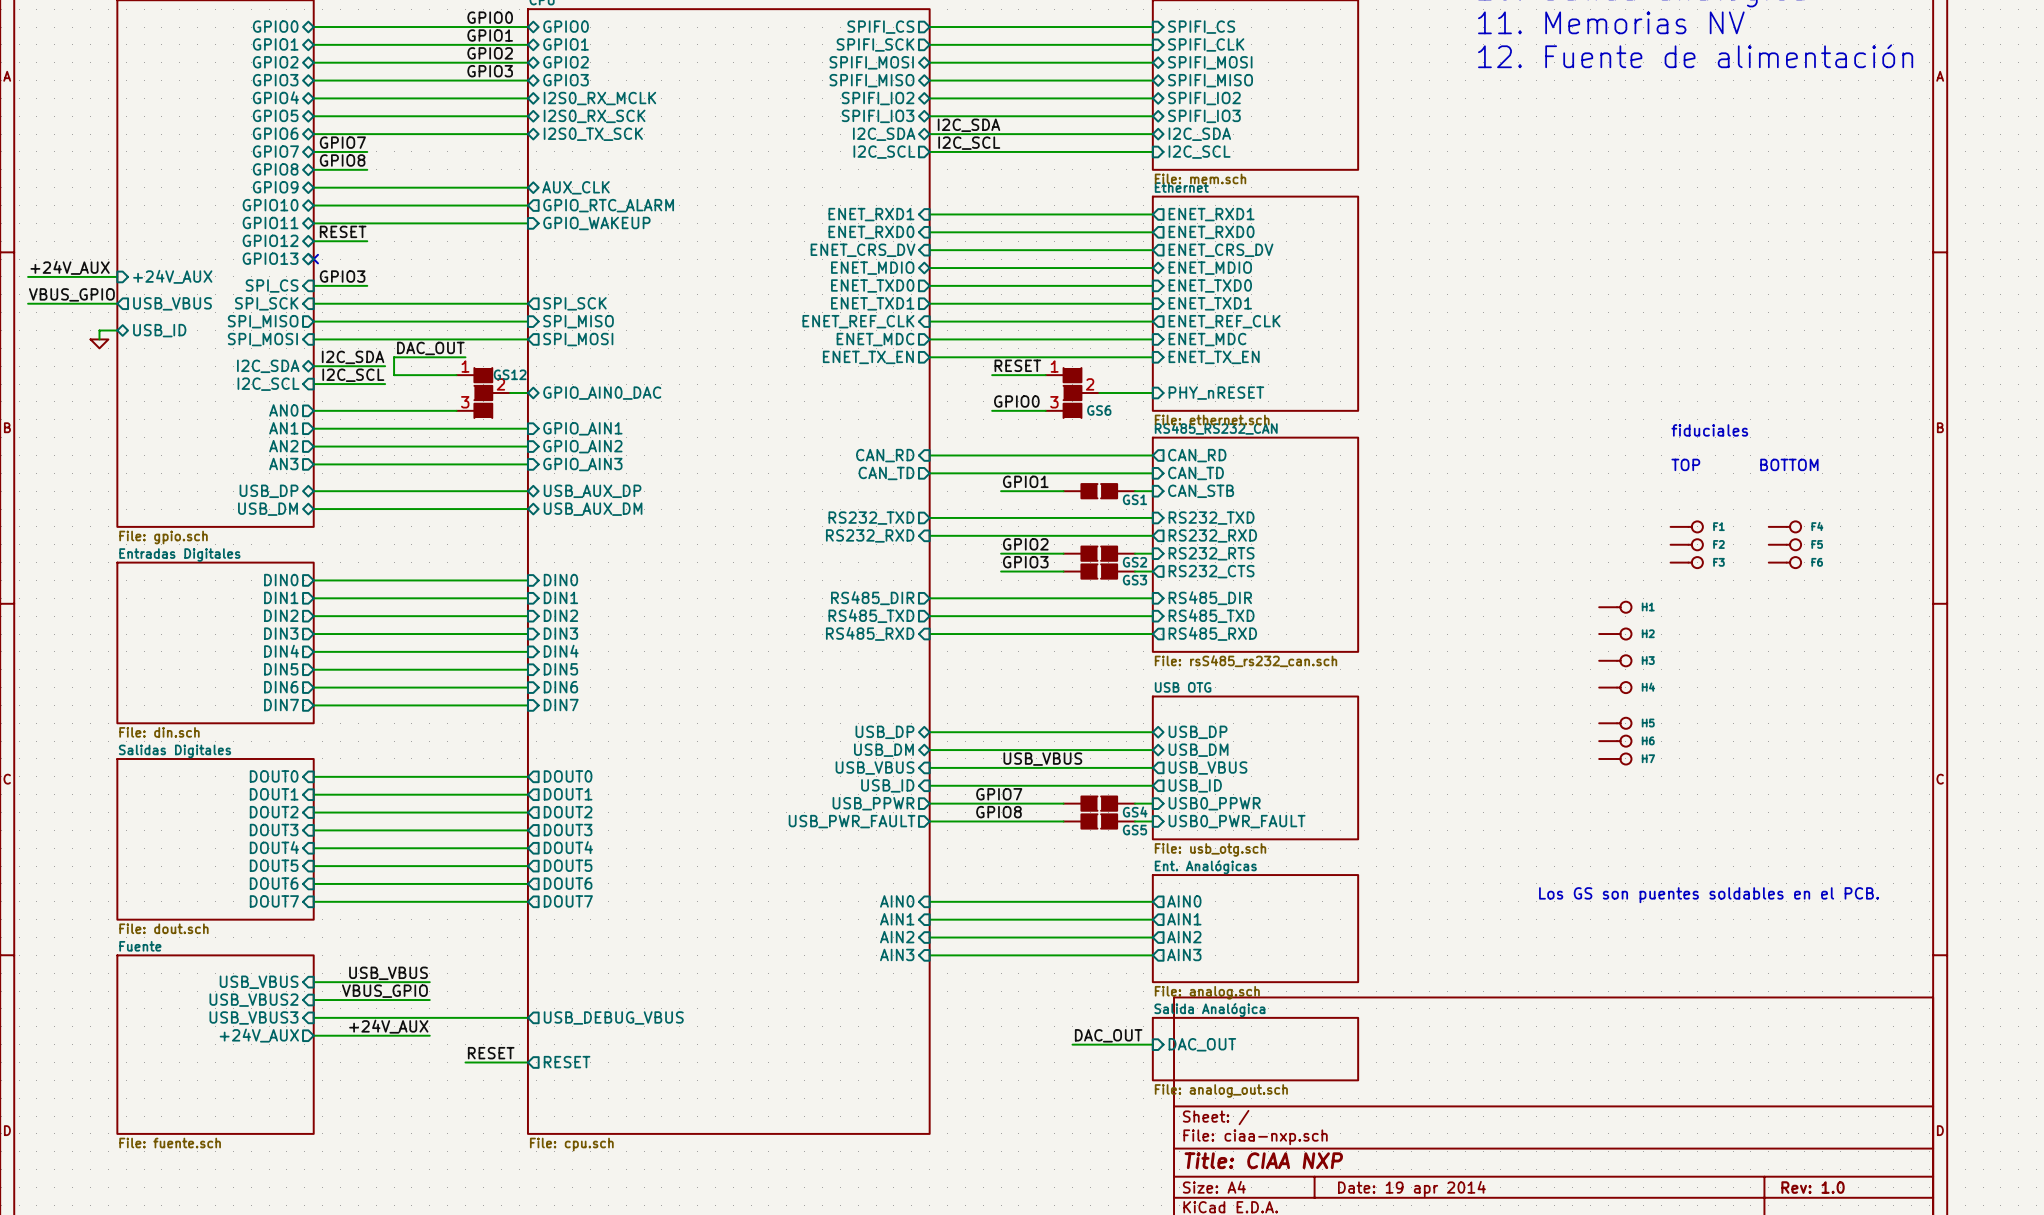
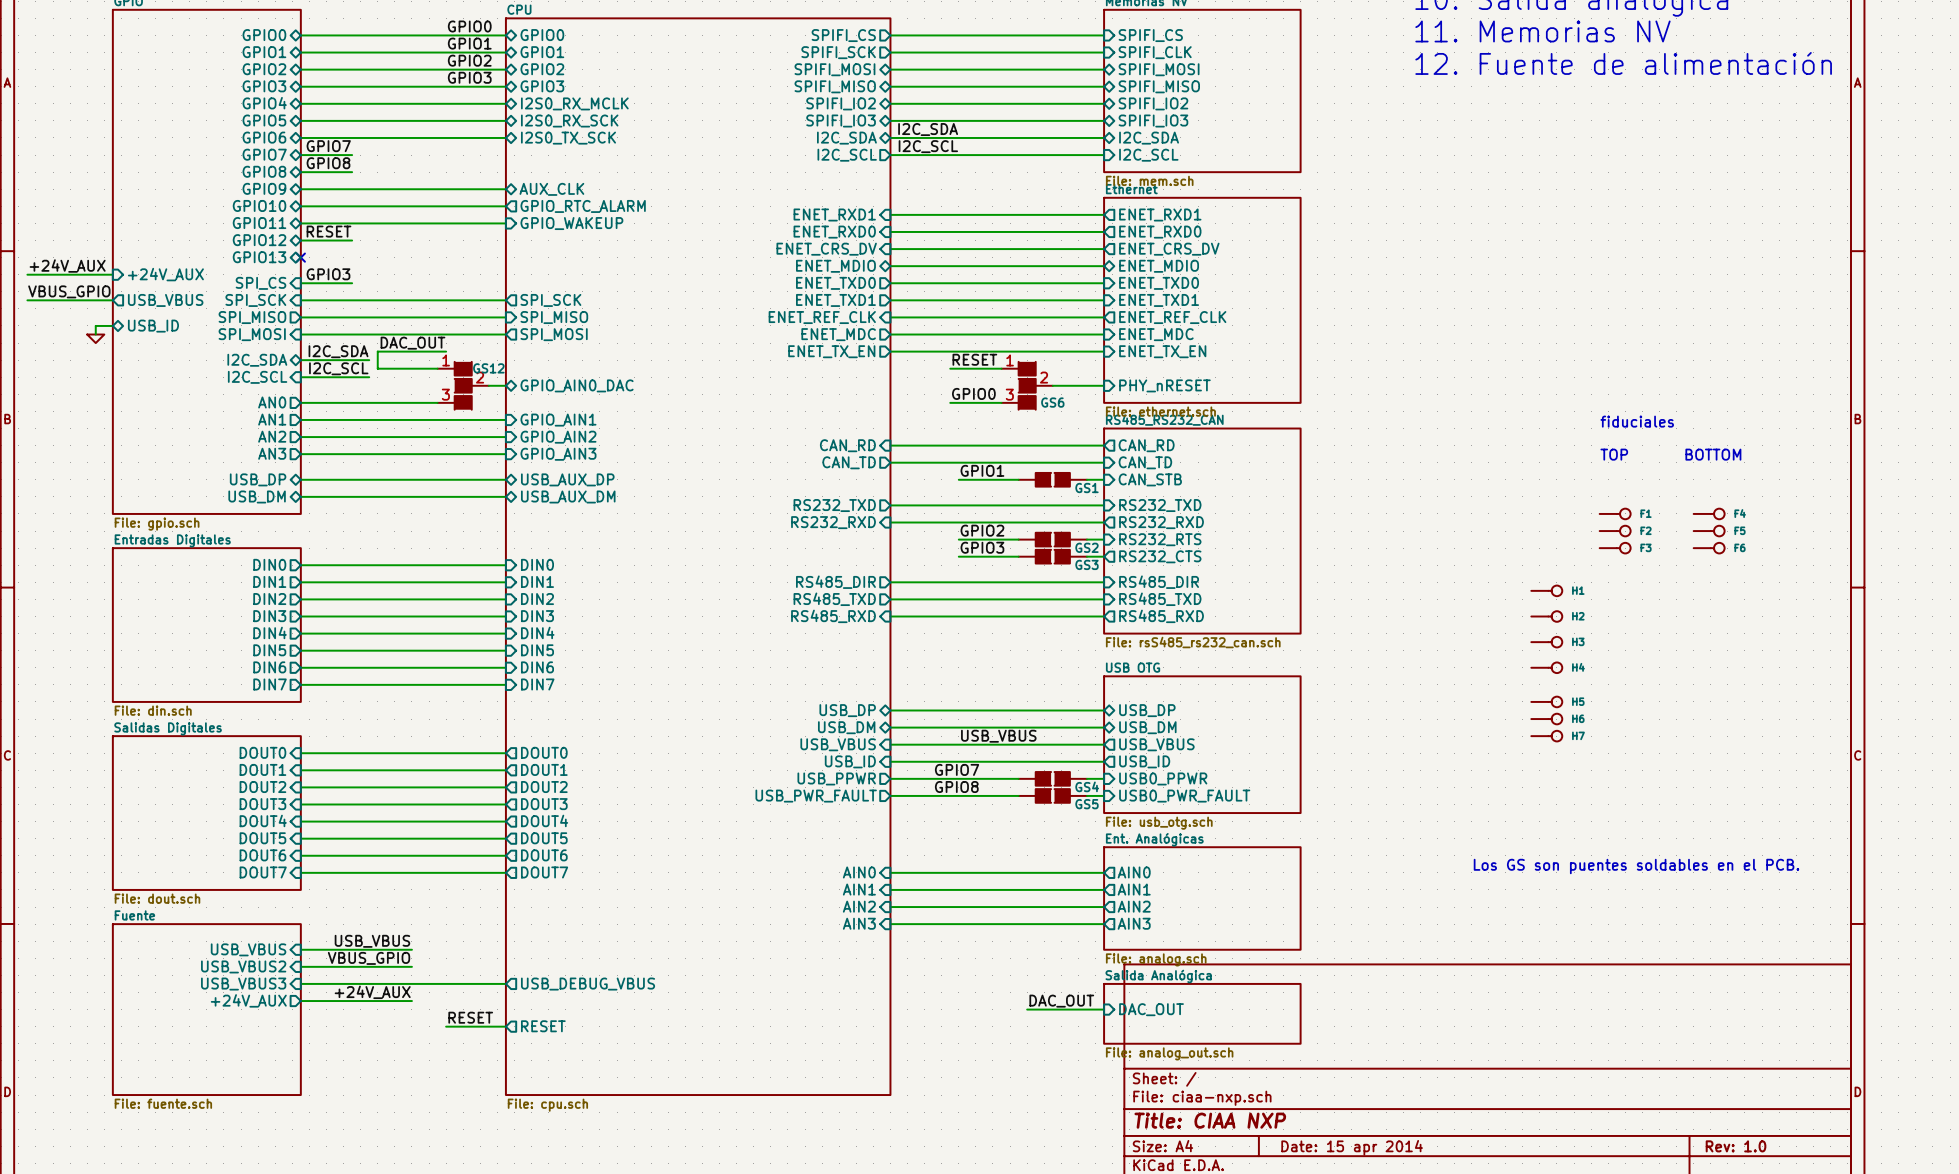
title block: Date: 19 apr 2014 (1411, 1189) -> Date: 15 apr 2014 (1352, 1147)

